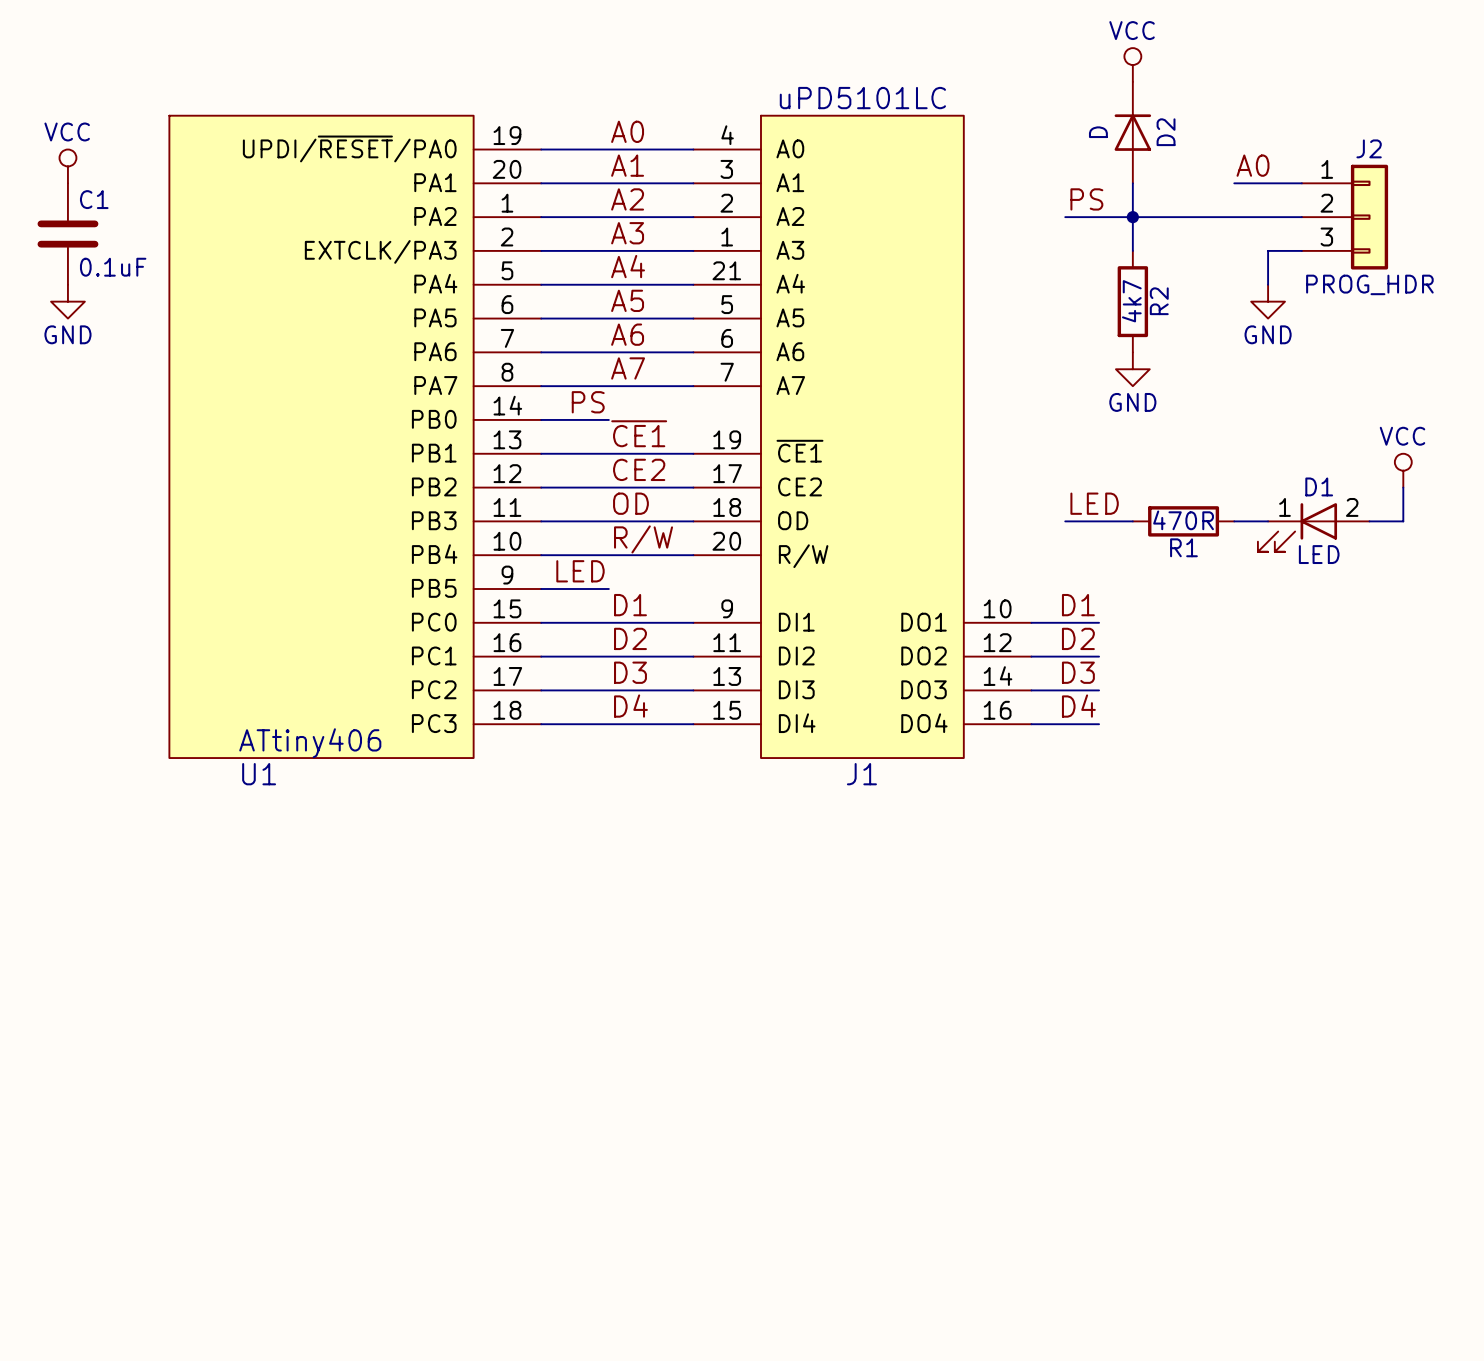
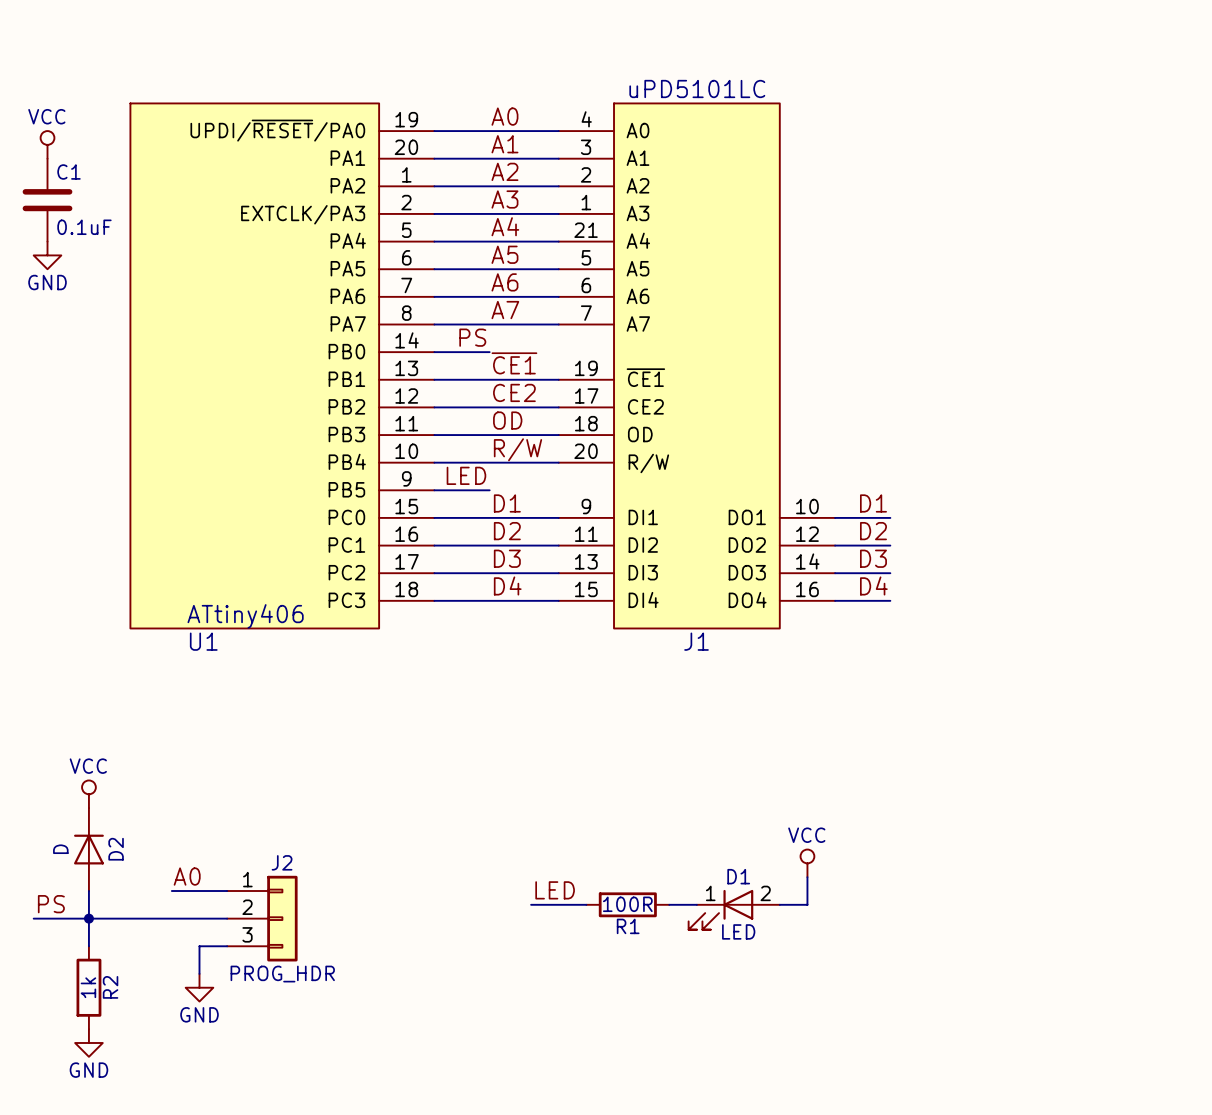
power symbol: VCC (1132, 65) -> none
D2 position: (1132, 132) -> (88, 849)
label: A0 (1252, 165) -> none
wire: (1132, 183) (1132, 250) -> none
wire: (1234, 183) (1301, 183) -> none
label: PS (1086, 199) -> none
wire: (1065, 217) (1301, 217) -> none
junction: (1132, 217) -> none
J2 position: (1344, 217) -> (262, 918)
wire: (1301, 250) (1268, 250) (1268, 284) -> none
R2 value: 4k7 (1131, 301) -> 1k (88, 987)
R2 position: (1132, 301) -> (88, 987)
power symbol: GND (1268, 301) -> none
power symbol: GND (1132, 369) -> none
power symbol: VCC (1403, 470) -> none
wire: (1403, 487) (1403, 521) (1369, 521) -> none
label: LED (1094, 503) -> none
R1 value: 470R (1183, 520) -> 100R (627, 904)
wire: (1065, 521) (1132, 521) -> none
R1 position: (1183, 521) -> (627, 904)
wire: (1234, 521) (1268, 521) -> none
D1 position: (1313, 527) -> (734, 909)
power symbol: none -> VCC (88, 794)
power symbol: none -> VCC (807, 863)
label: none -> A0 (187, 876)
wire: none -> (807, 877) (807, 904) (779, 904)
label: none -> LED (555, 890)
wire: none -> (88, 891) (88, 946)
wire: none -> (171, 891) (227, 891)
label: none -> PS (51, 904)
wire: none -> (531, 904) (586, 904)
wire: none -> (669, 904) (696, 904)
wire: none -> (33, 918) (227, 918)
junction: none -> (88, 918)
wire: none -> (227, 946) (199, 946) (199, 973)
power symbol: none -> GND (199, 987)
power symbol: none -> GND (88, 1042)

